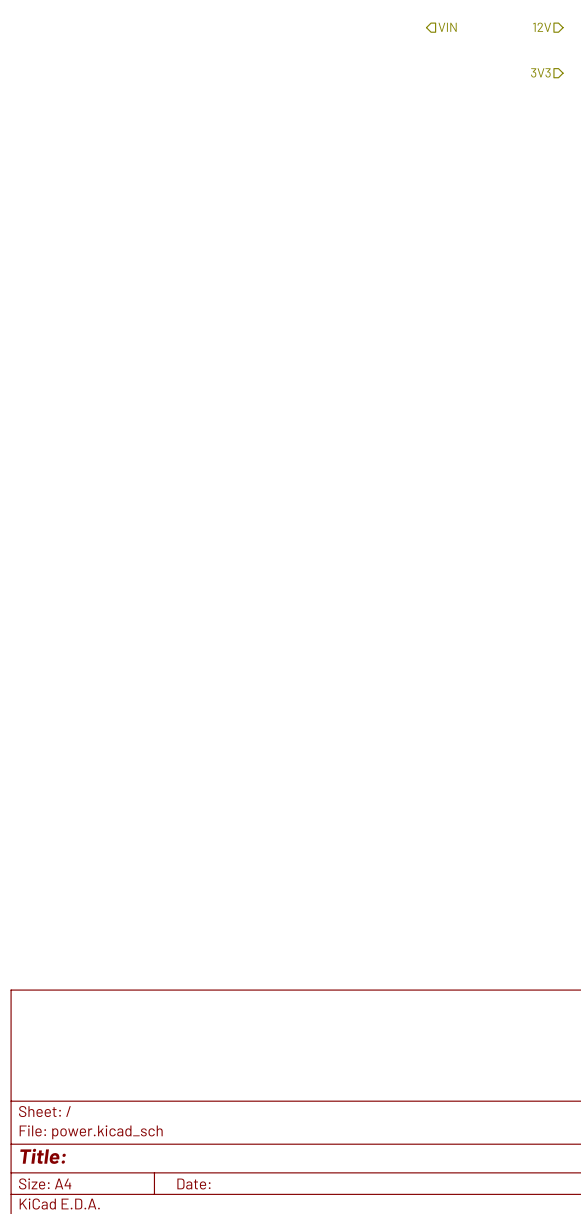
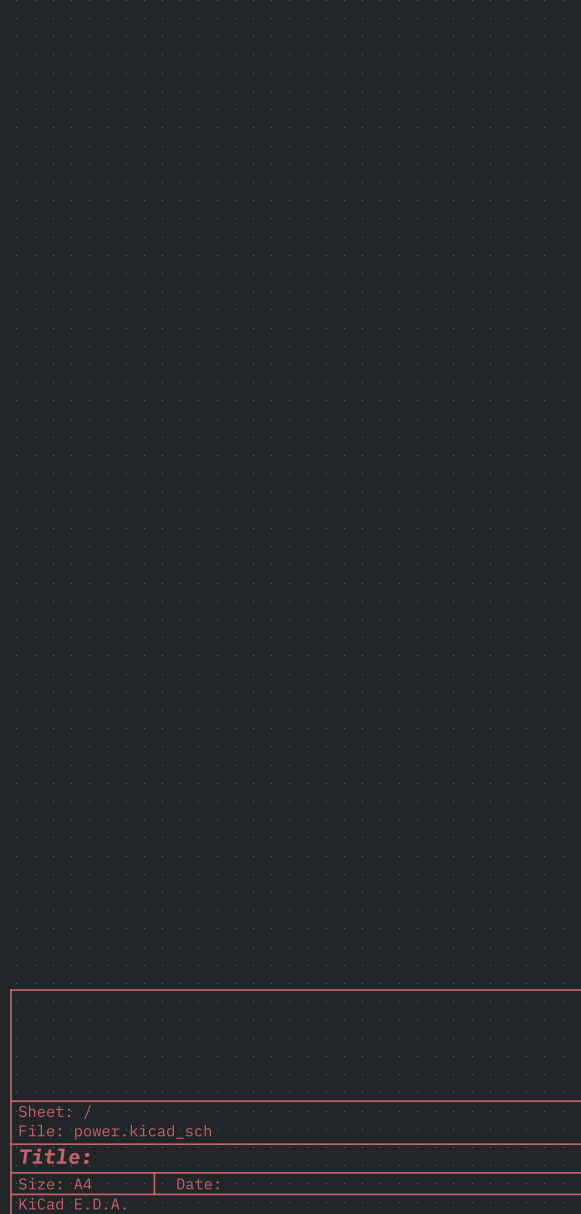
hierarchical label: VIN (447, 27) -> none
hierarchical label: 12V (542, 27) -> none
hierarchical label: 3V3 (540, 72) -> none

